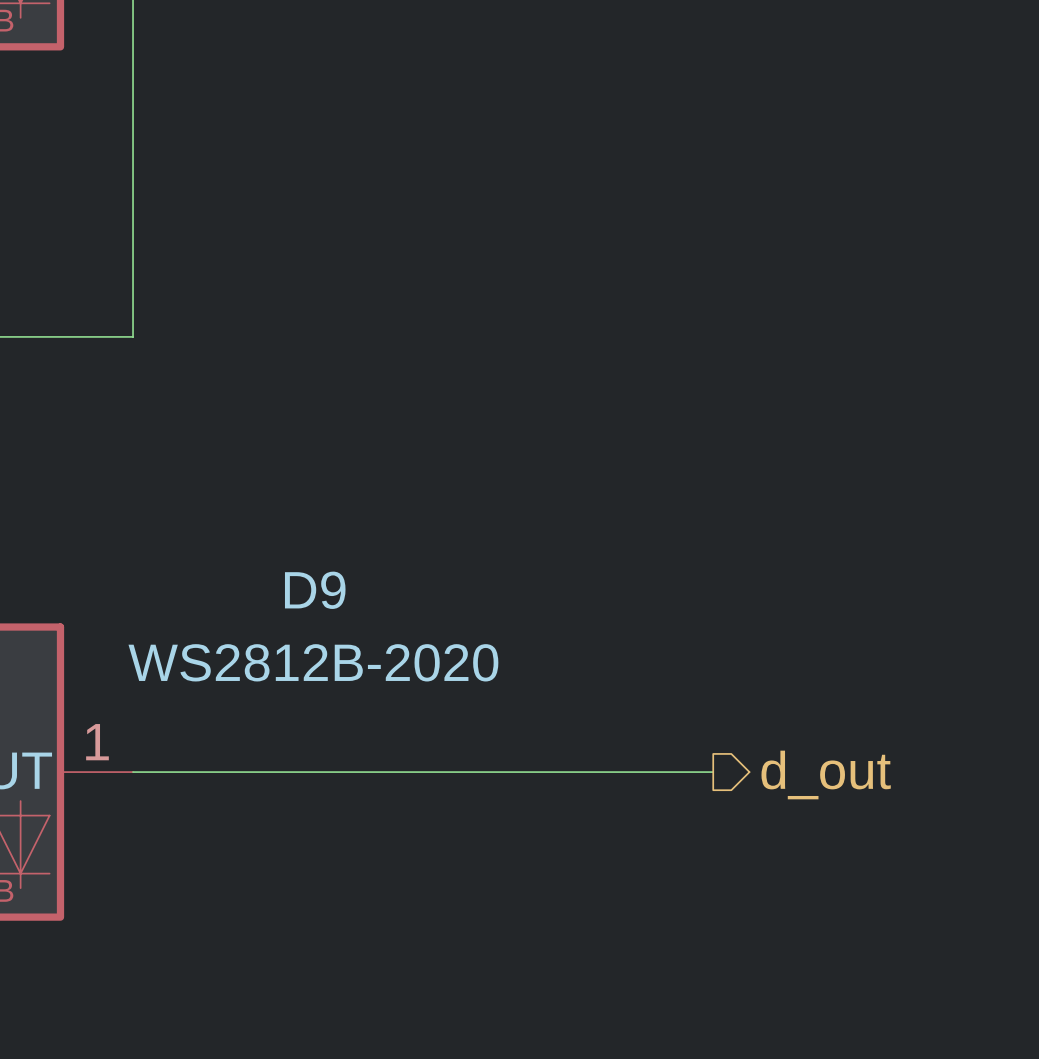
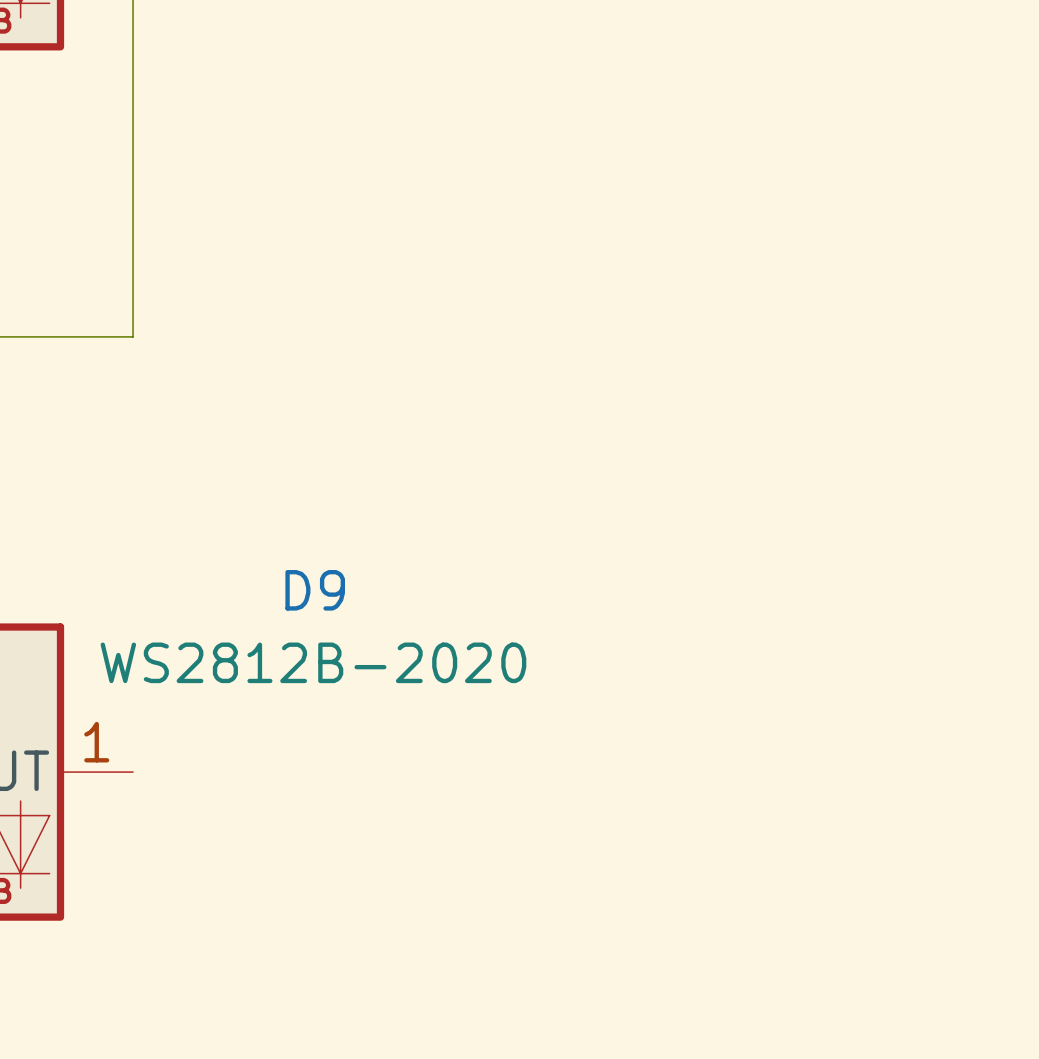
wire: (133, 772) (713, 772) -> none
hierarchical label: d_out (826, 774) -> none

